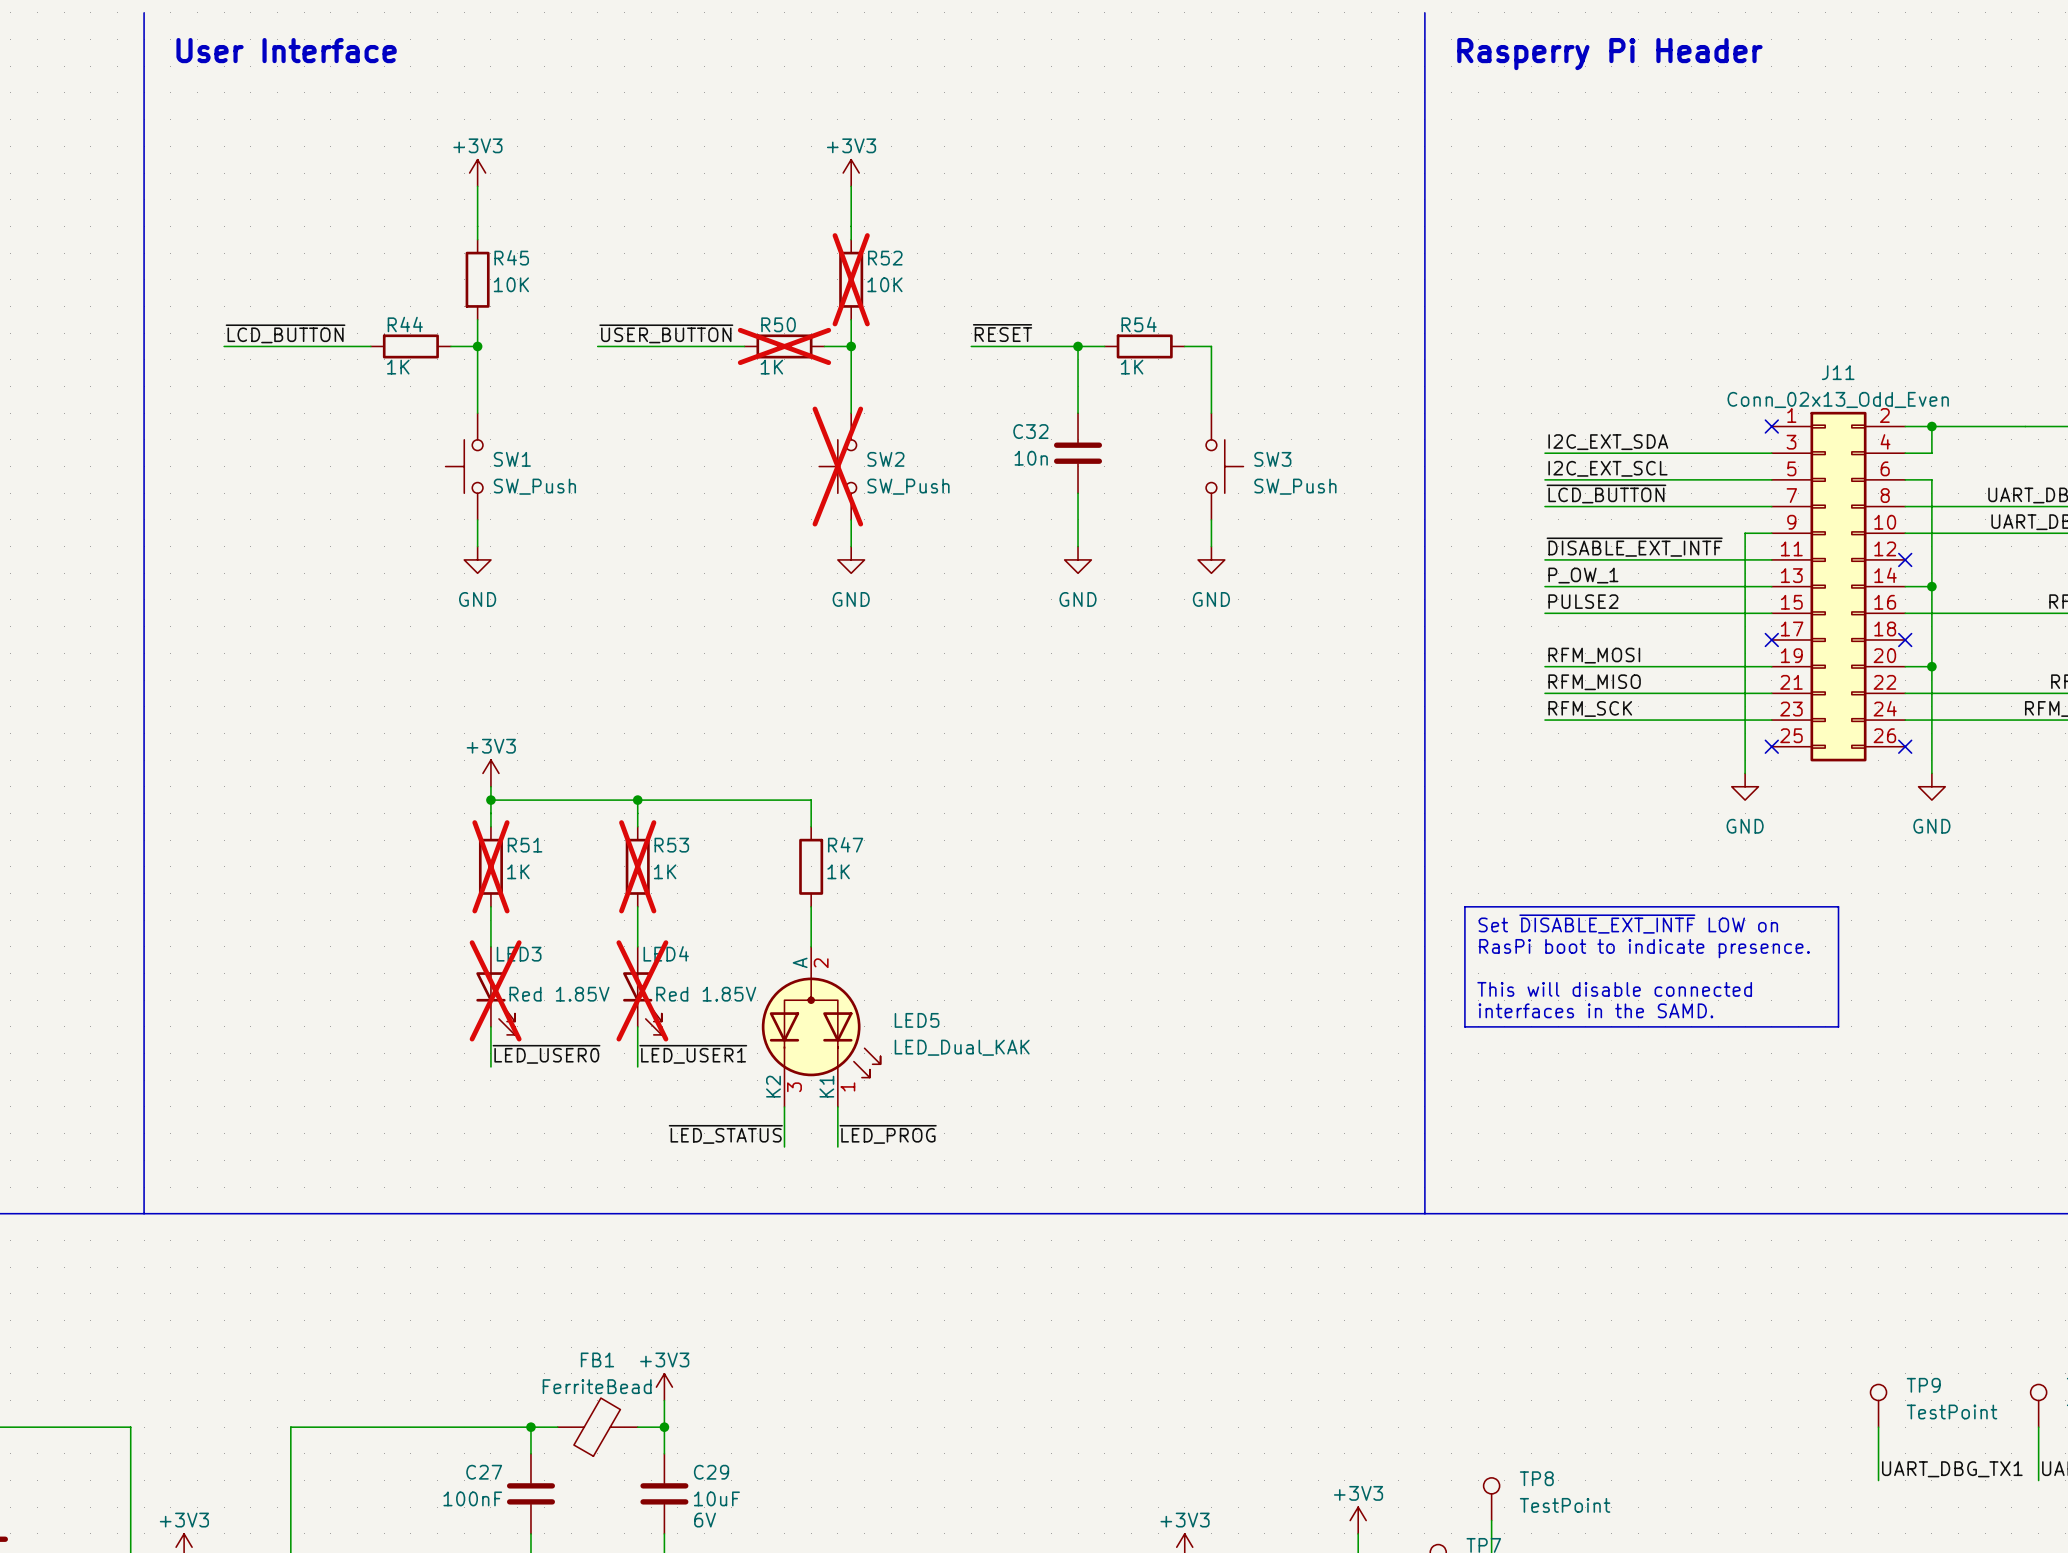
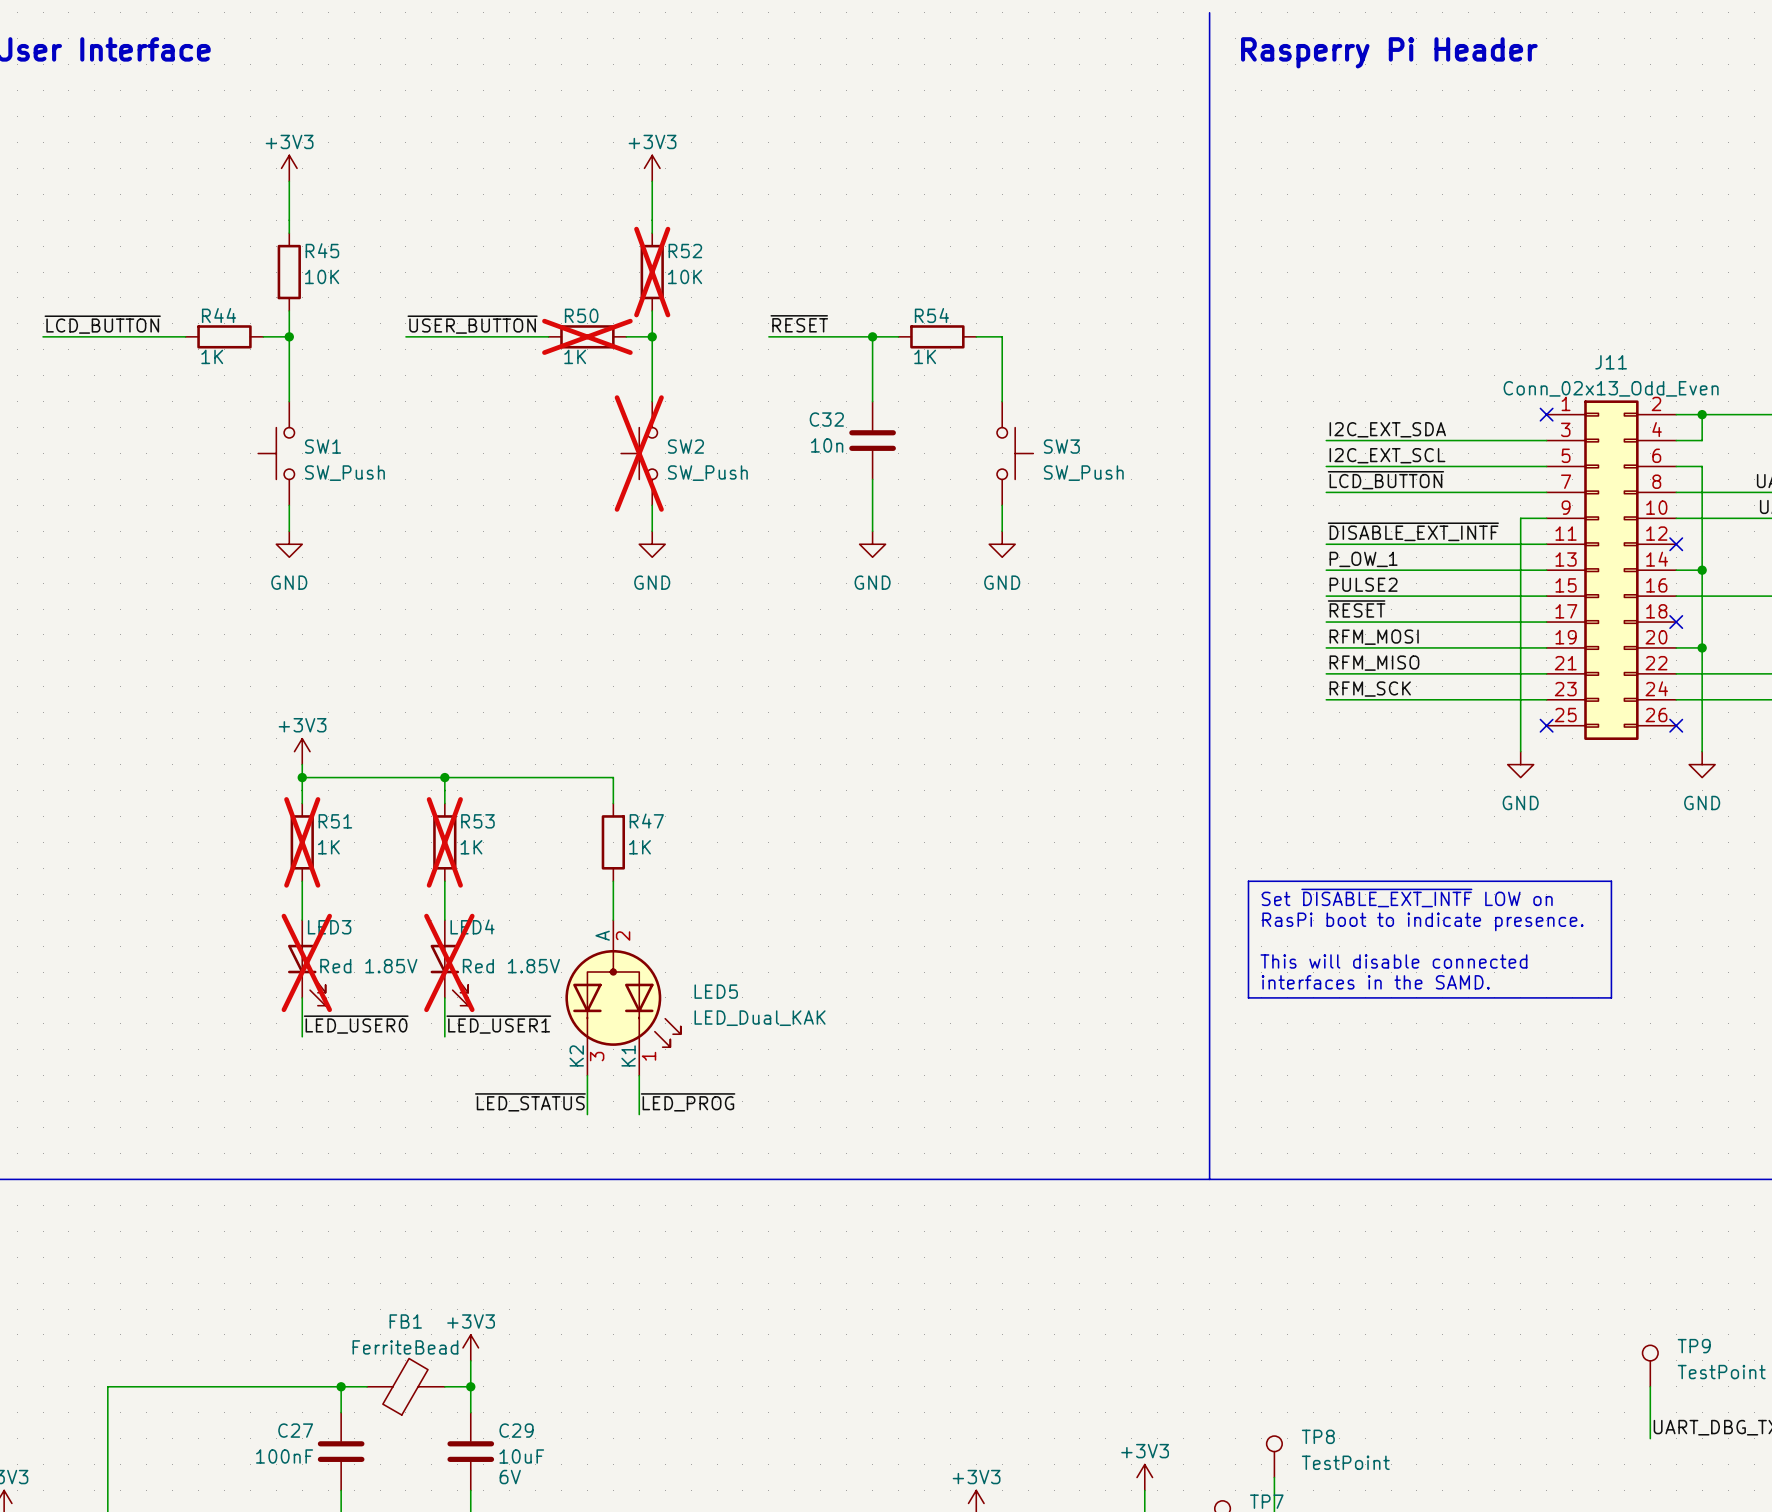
label: none -> ~{RESET} (1356, 608)
wire: none -> (1326, 622) (1546, 622)
no-connect mark: (1771, 639) -> none

